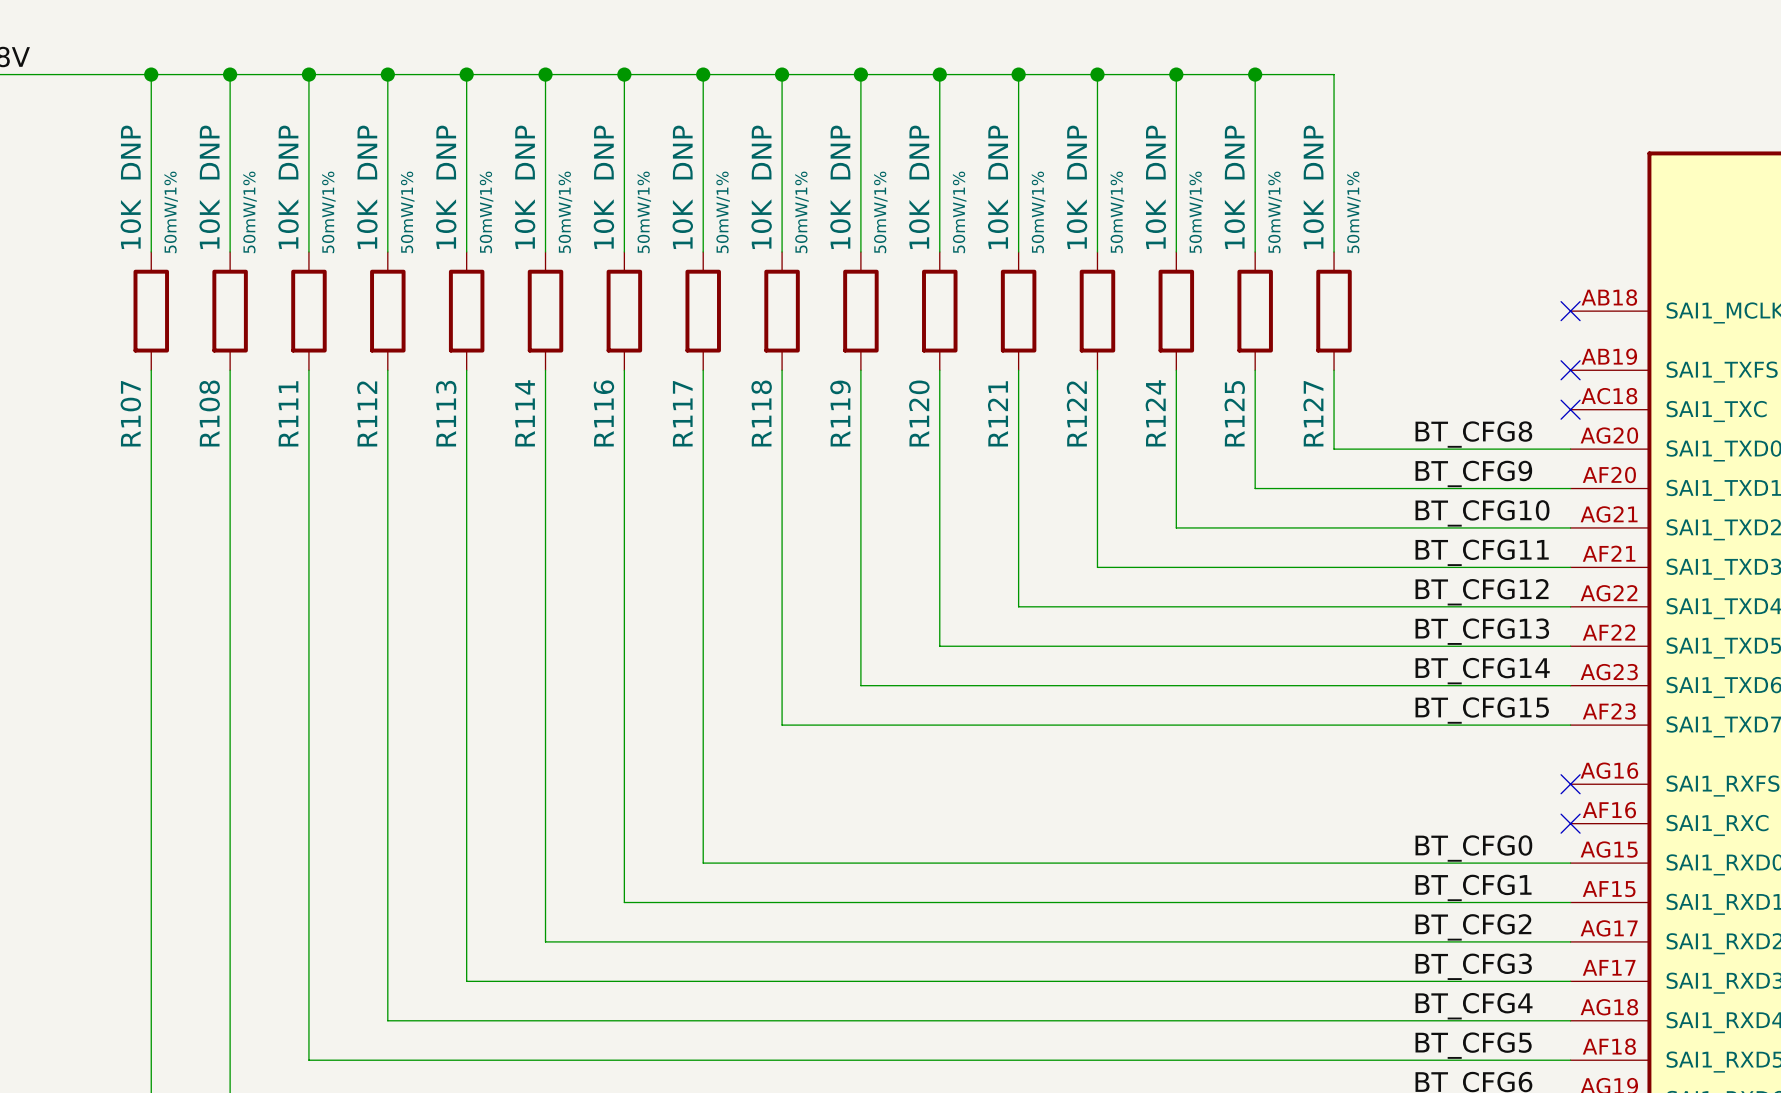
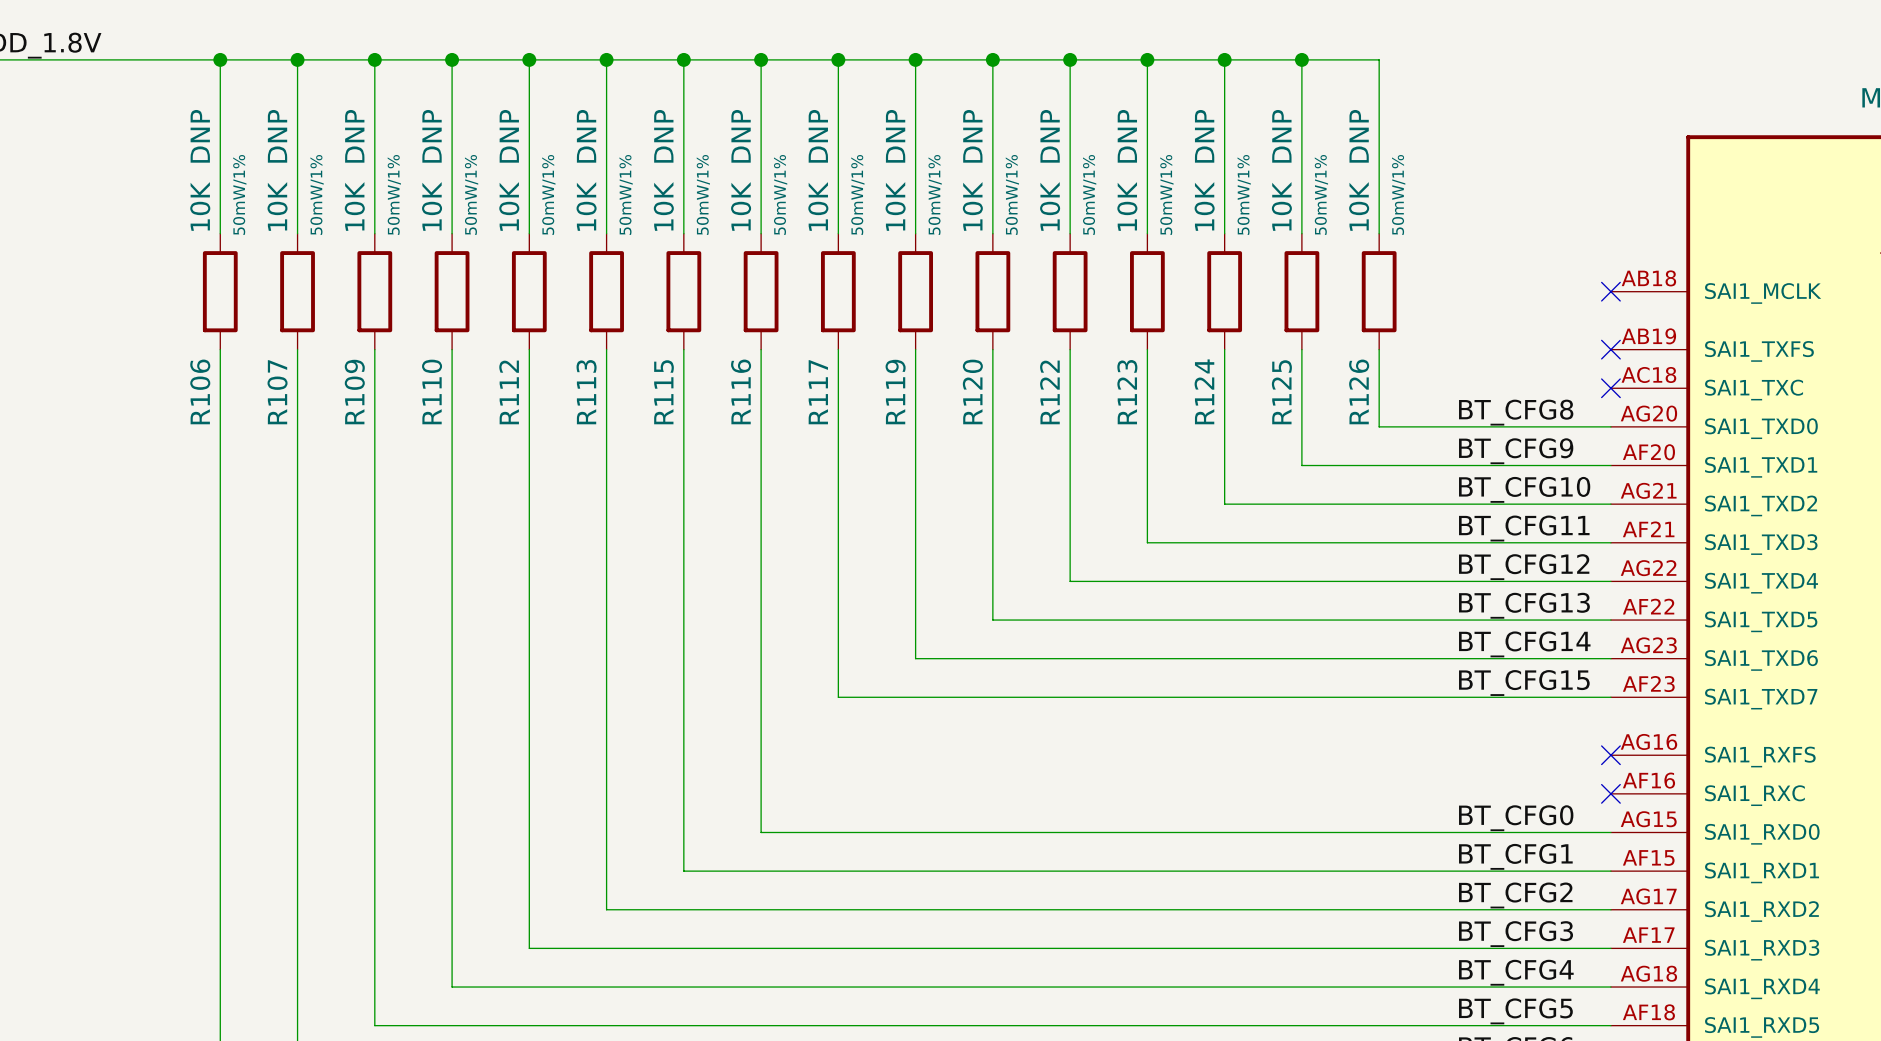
R107 name: R107 (130, 413) -> R106 (200, 391)
R108 name: R108 (209, 413) -> R107 (277, 392)
R111 name: R111 (288, 413) -> R109 (354, 392)
R112 name: R112 (367, 413) -> R110 (432, 391)
R113 name: R113 (446, 413) -> R112 (509, 392)
R114 name: R114 (525, 413) -> R113 (586, 392)
R116 name: R116 (603, 413) -> R115 (663, 392)
R117 name: R117 (682, 413) -> R116 (741, 391)
R118 name: R118 (761, 413) -> R117 (818, 392)
R121 name: R121 (997, 413) -> R122 (1049, 392)
R122 name: R122 (1076, 413) -> R123 (1127, 392)
R127 name: R127 (1313, 413) -> R126 (1359, 391)

